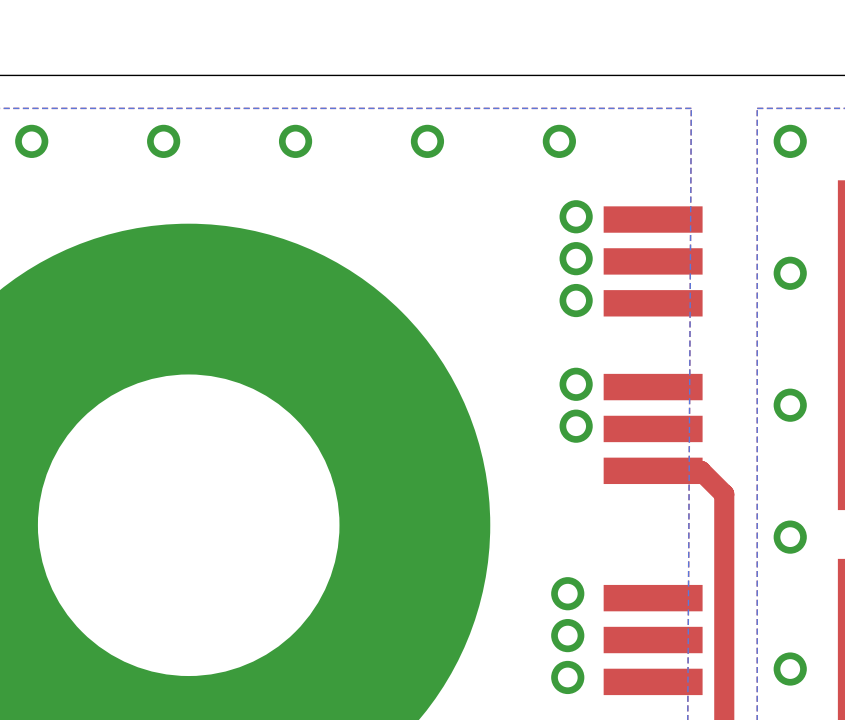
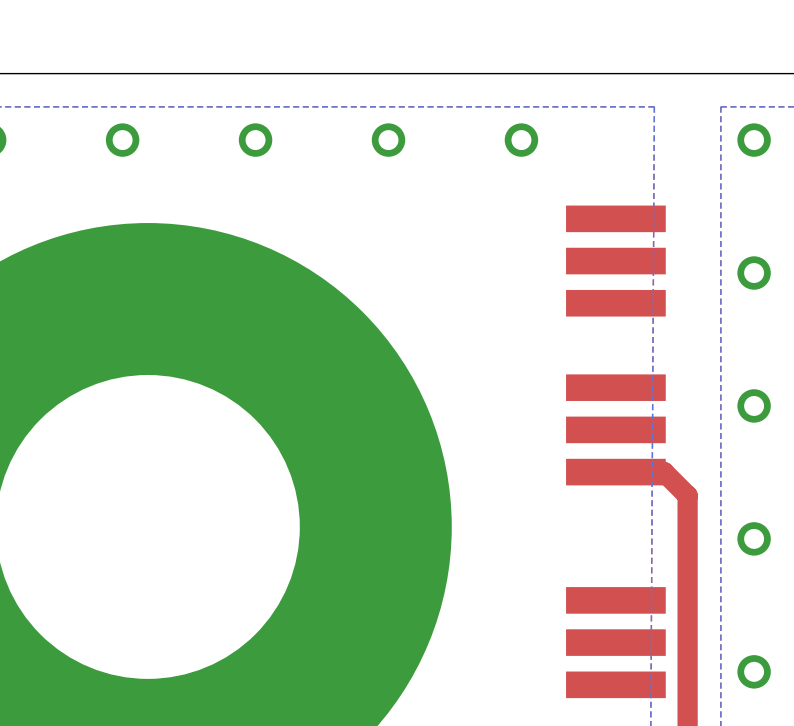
via: (576, 216) -> none
via: (576, 258) -> none
via: (576, 300) -> none
via: (576, 384) -> none
via: (576, 426) -> none
via: (567, 593) -> none
via: (567, 635) -> none
via: (567, 677) -> none

